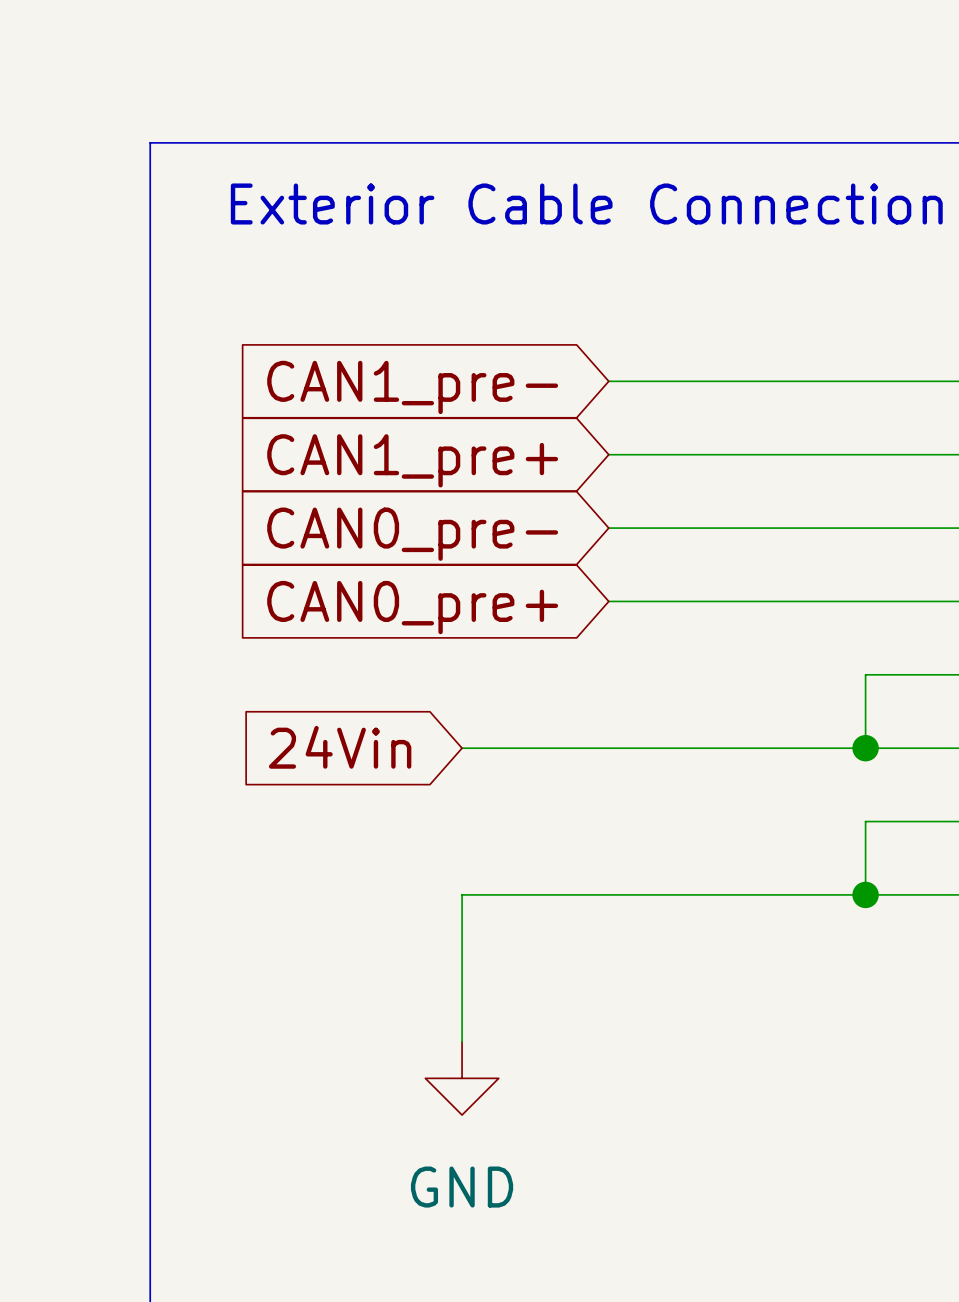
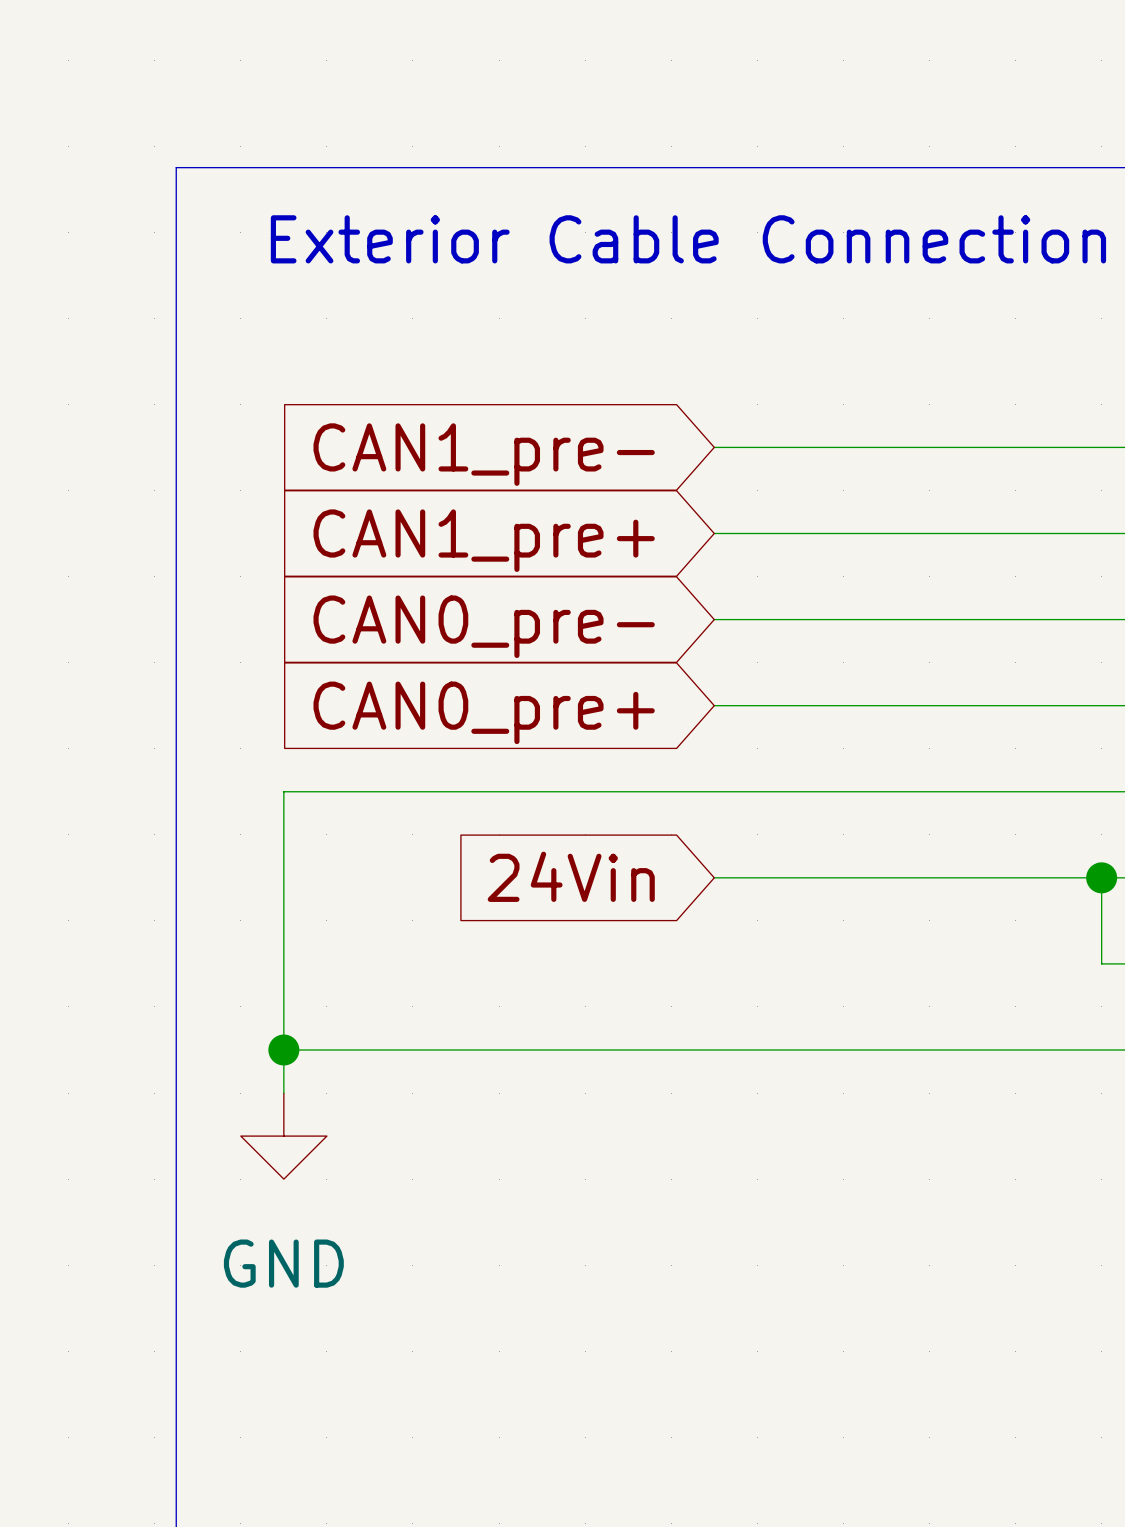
wire: (865, 674) (865, 748) -> (1015, 791) (283, 791) (283, 1093)
global label position: 24Vin (340, 747) -> 24Vin (571, 876)
wire: (462, 748) (608, 748) -> none
junction position: (865, 748) -> (1101, 877)
wire: (938, 821) (865, 821) (865, 894) -> (1101, 963) (1101, 877)
junction: none -> (283, 1050)
wire: (462, 894) (462, 1041) -> (542, 1050) (283, 1050)
junction: (865, 894) -> none
power symbol position: GND (462, 1078) -> GND (283, 1136)

